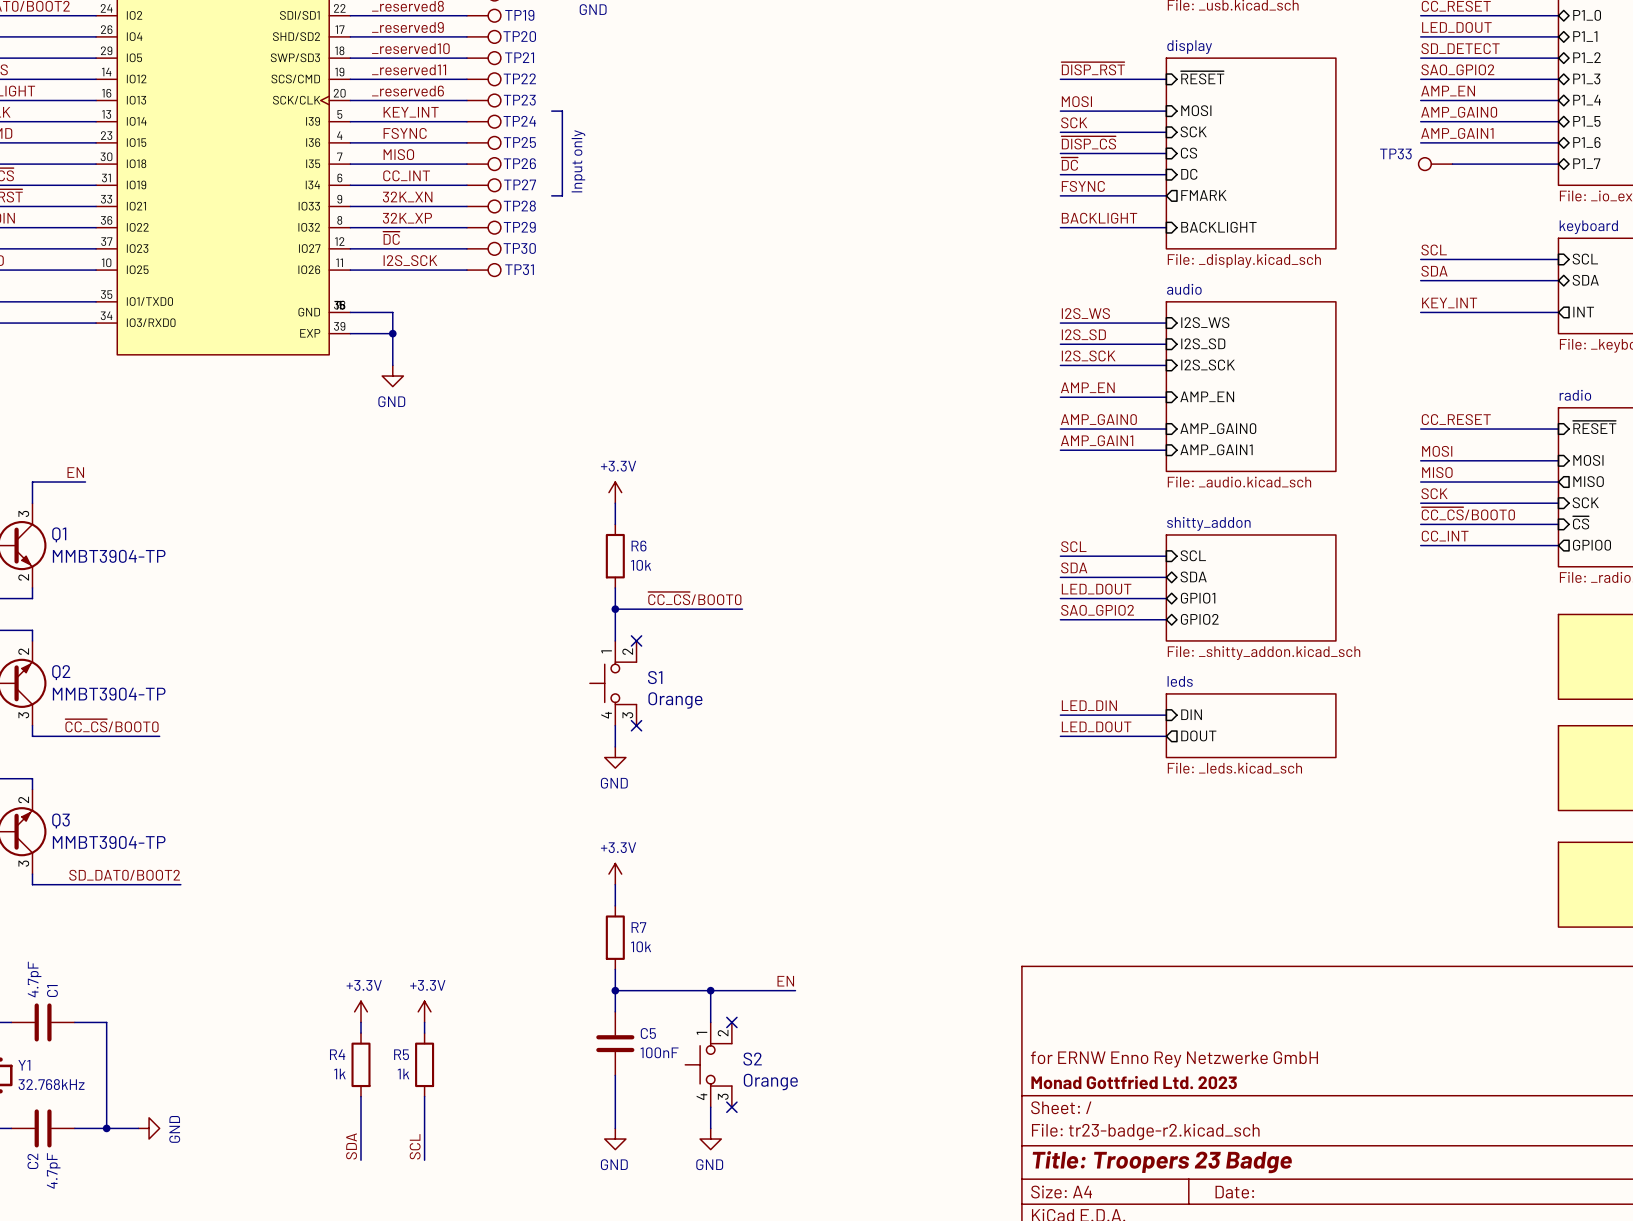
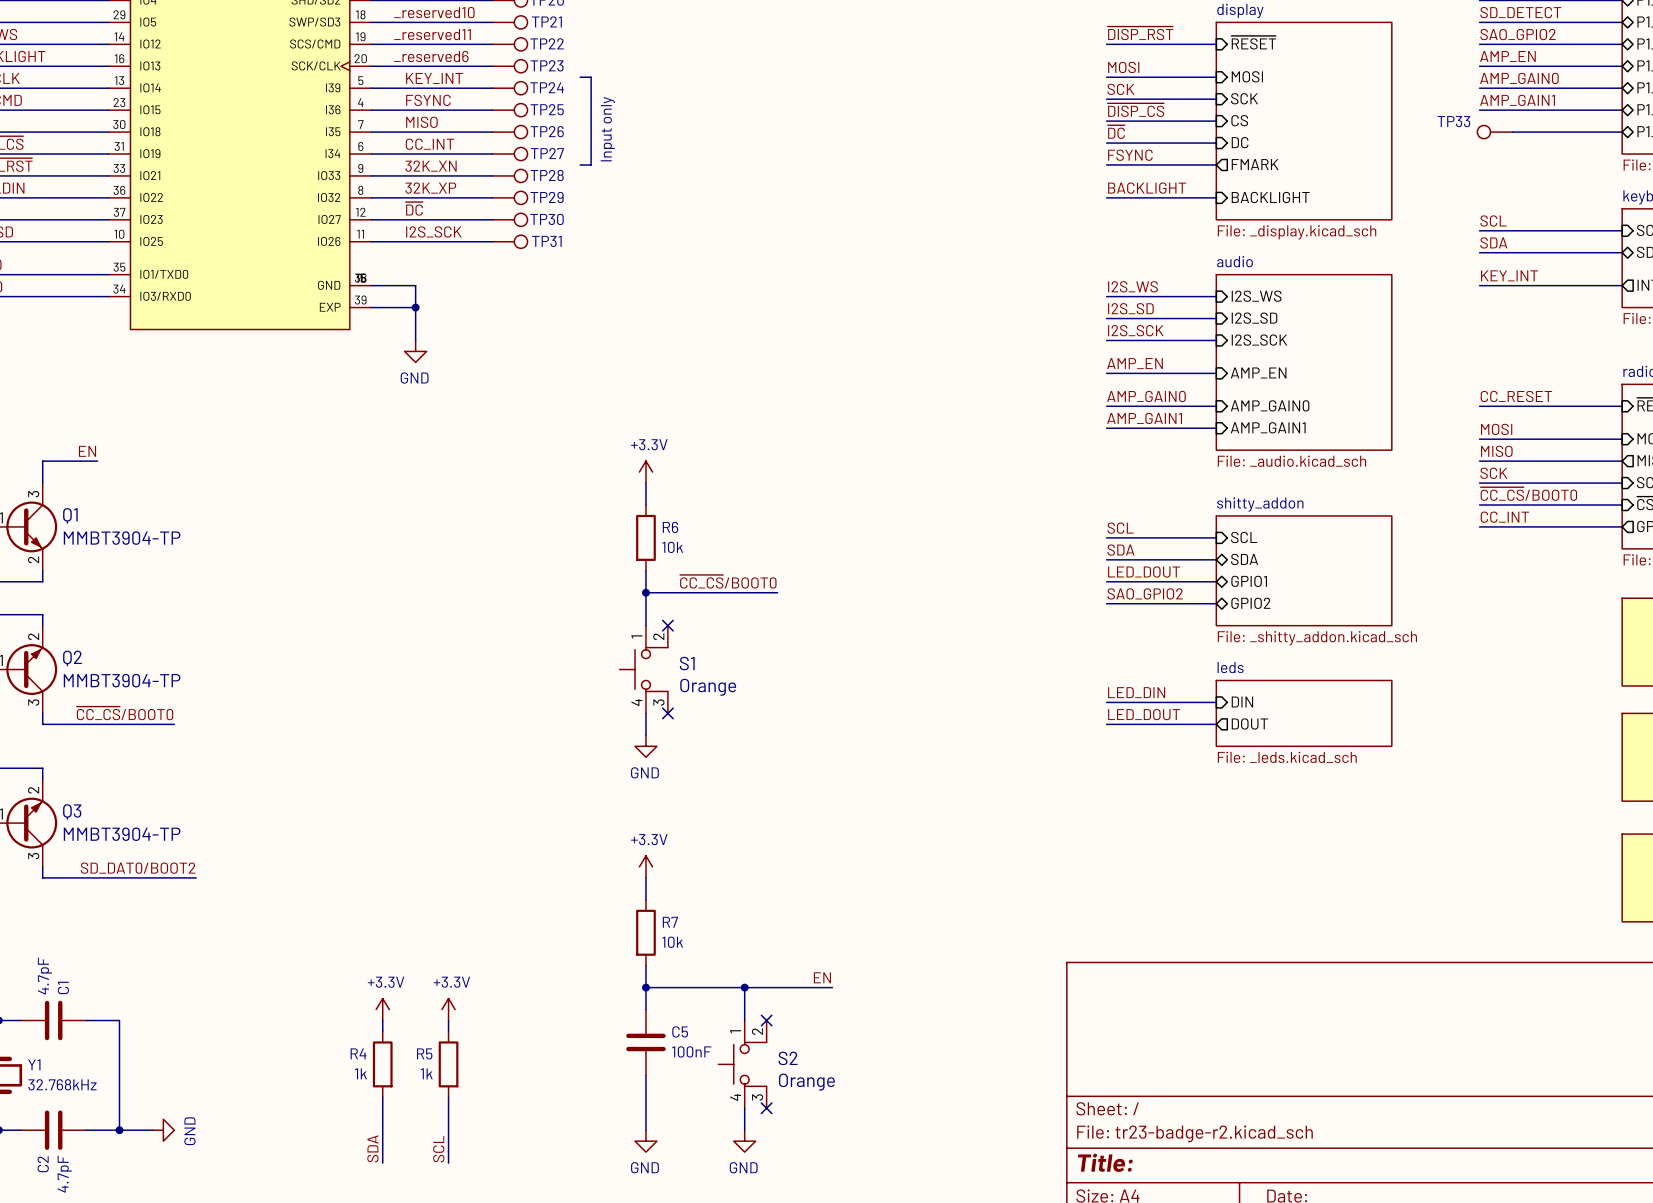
title block: for ERNW Enno Rey Netzwerke GmbH (1174, 1059) -> none
title block: Monad Gottfried Ltd. 2023 (1134, 1082) -> none
title block: Title: Troopers 23 Badge (1162, 1162) -> Title: (1105, 1162)

